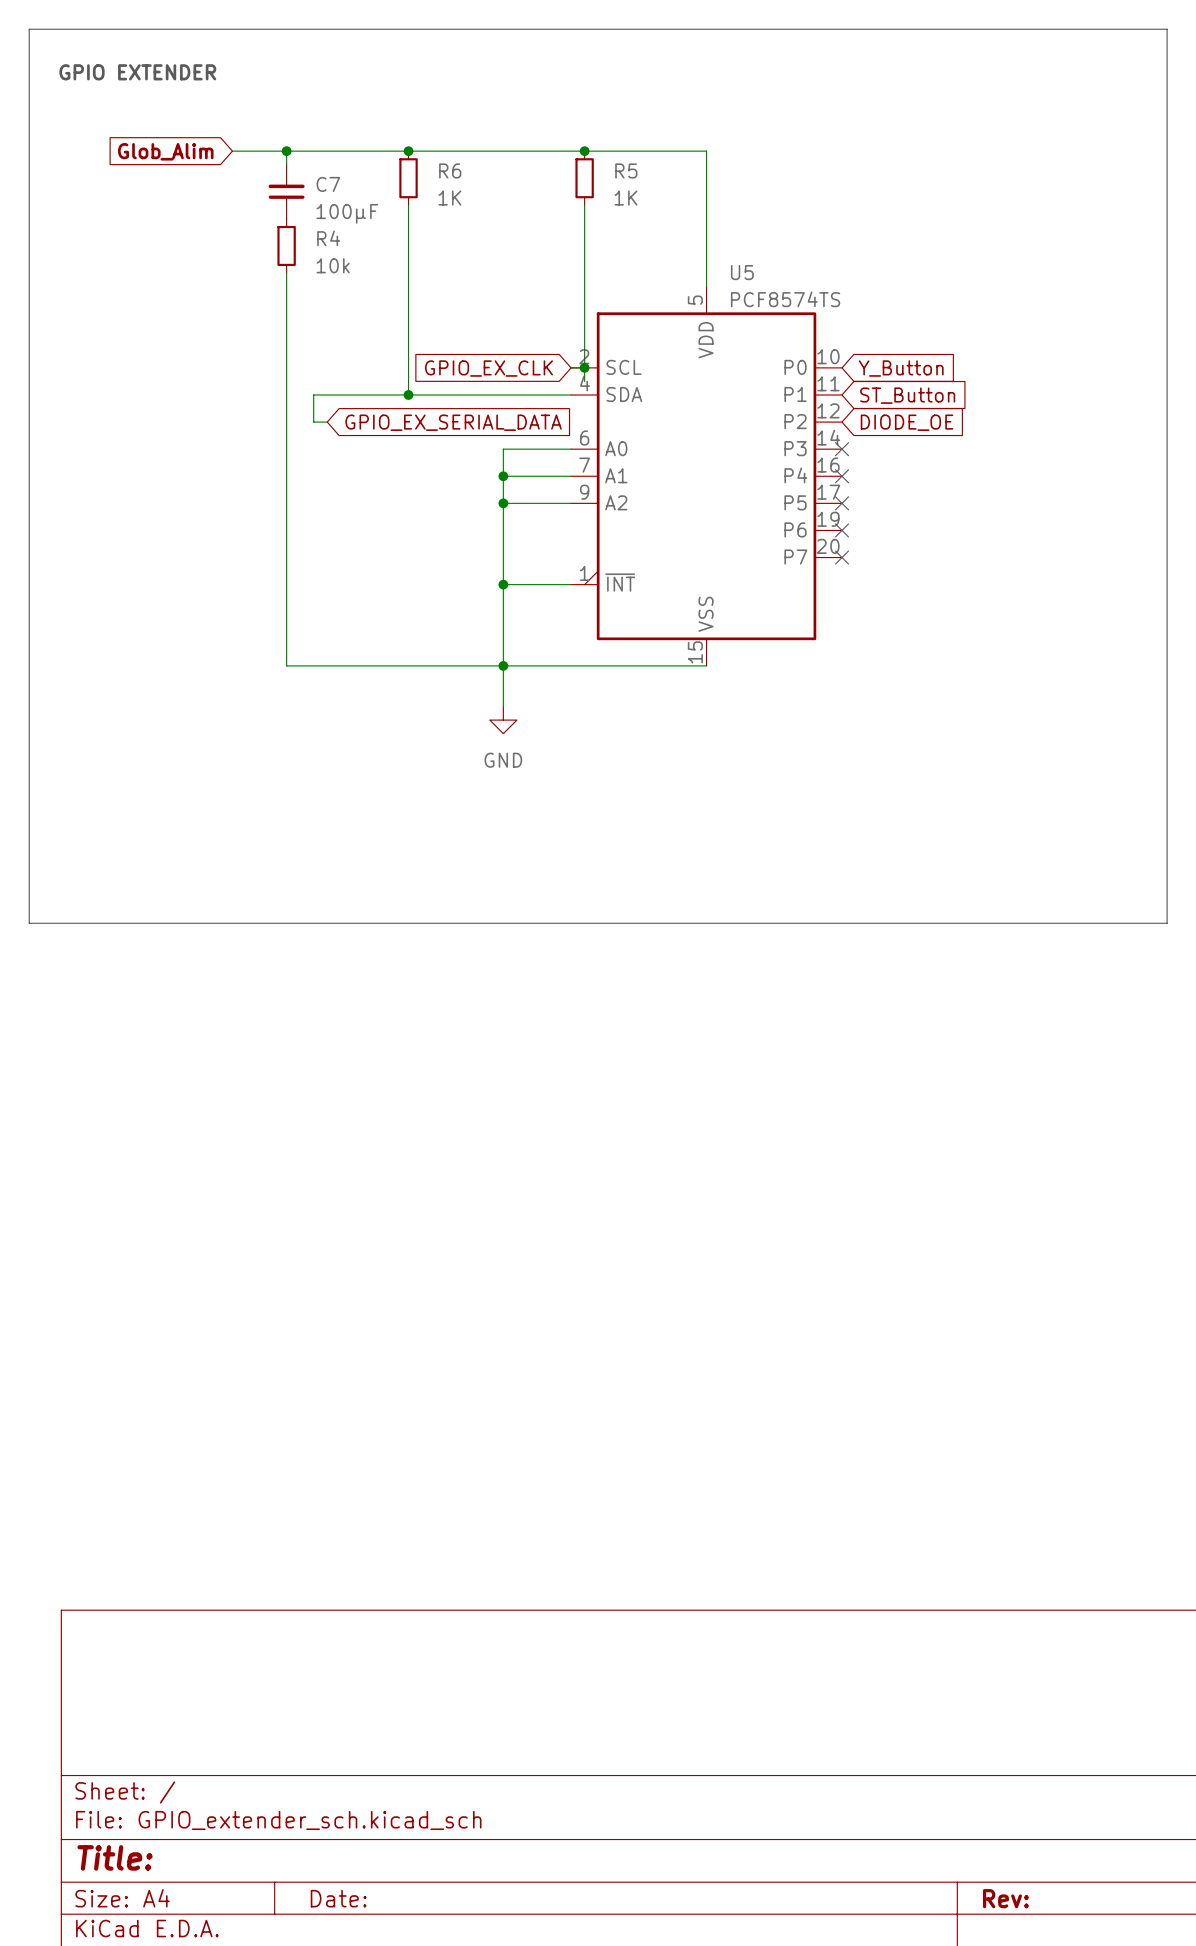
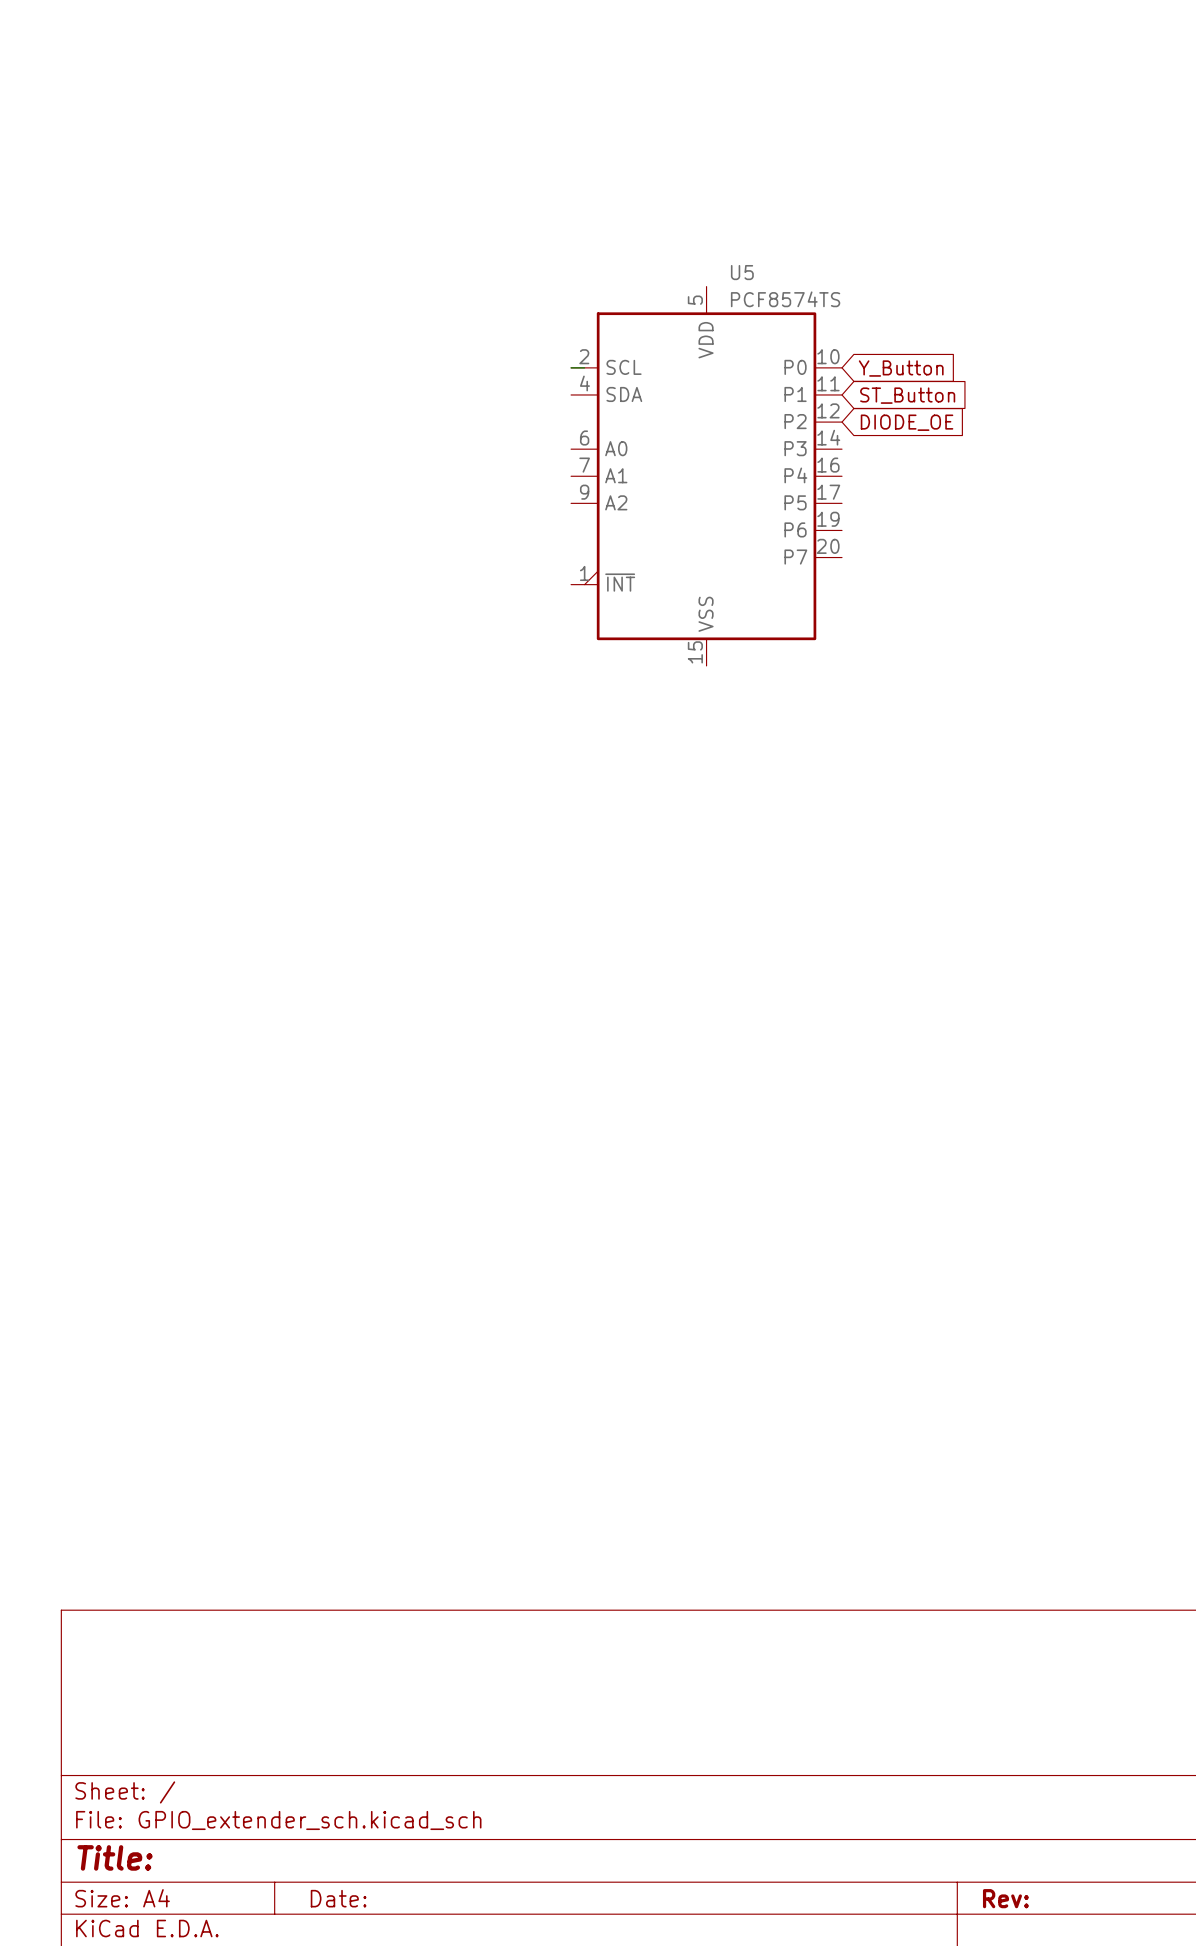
line: (29, 29) (1167, 29) (1167, 923) (29, 923) (29, 29) -> none
text: GPIO EXTENDER (137, 72) -> none
global label: Glob_Alim (165, 151) -> none
wire: (232, 151) (706, 151) (706, 286) -> none
wire: (286, 151) (286, 164) -> none
junction: (286, 151) -> none
junction: (408, 151) -> none
junction: (584, 151) -> none
R6: 1K (408, 178) -> none
R5: 1K (584, 178) -> none
C7: 100µF (286, 191) -> none
wire: (408, 205) (408, 394) -> none
wire: (584, 205) (584, 381) -> none
R4: 10k (286, 245) -> none
wire: (286, 273) (286, 665) (706, 665) -> none
junction: (584, 367) -> none
global label: GPIO_EX_CLK (488, 368) -> none
junction: (408, 394) -> none
wire: (571, 394) (313, 394) (313, 422) (327, 422) -> none
global label: GPIO_EX_SERIAL_DATA (453, 422) -> none
wire: (571, 449) (503, 449) (503, 706) -> none
no-connect mark: (842, 449) -> none
wire: (503, 476) (571, 476) -> none
junction: (503, 476) -> none
no-connect mark: (842, 476) -> none
wire: (503, 503) (571, 503) -> none
junction: (503, 503) -> none
no-connect mark: (842, 503) -> none
no-connect mark: (842, 530) -> none
no-connect mark: (842, 557) -> none
wire: (503, 584) (571, 584) -> none
junction: (503, 584) -> none
junction: (503, 665) -> none
power symbol: GND (503, 720) -> none

